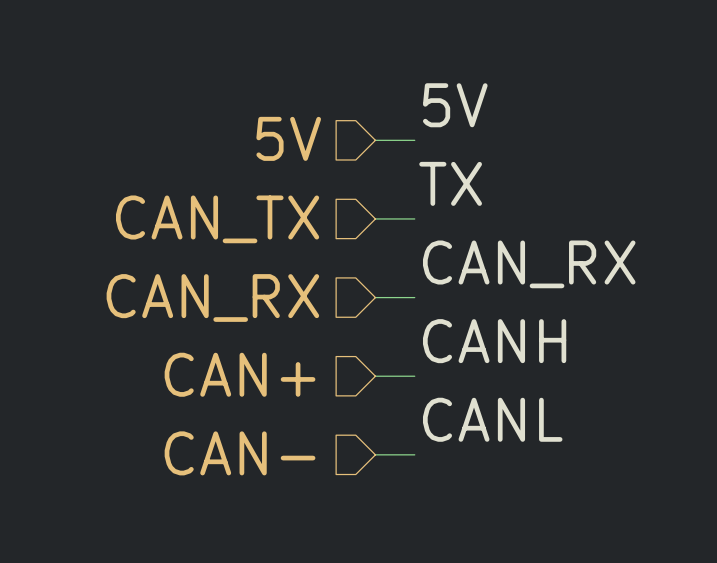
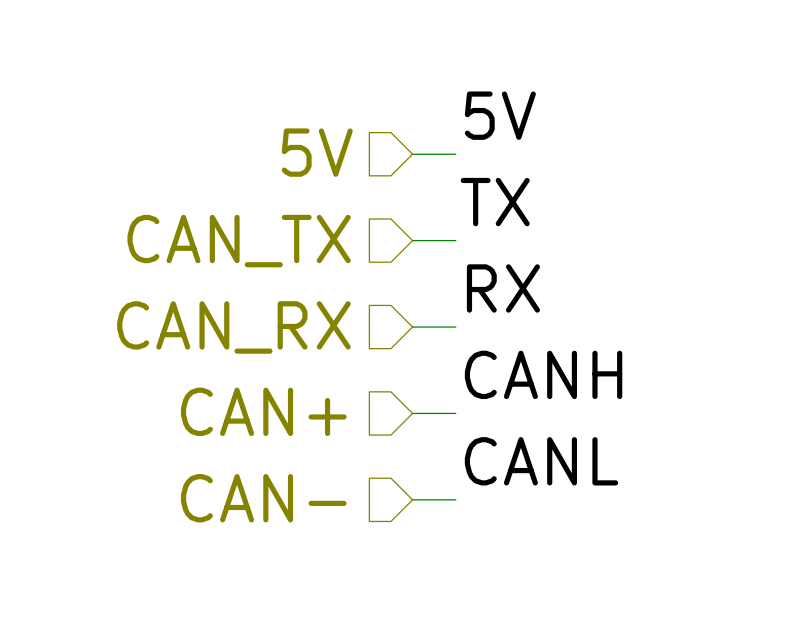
label: CAN_RX (529, 264) -> RX (503, 288)

